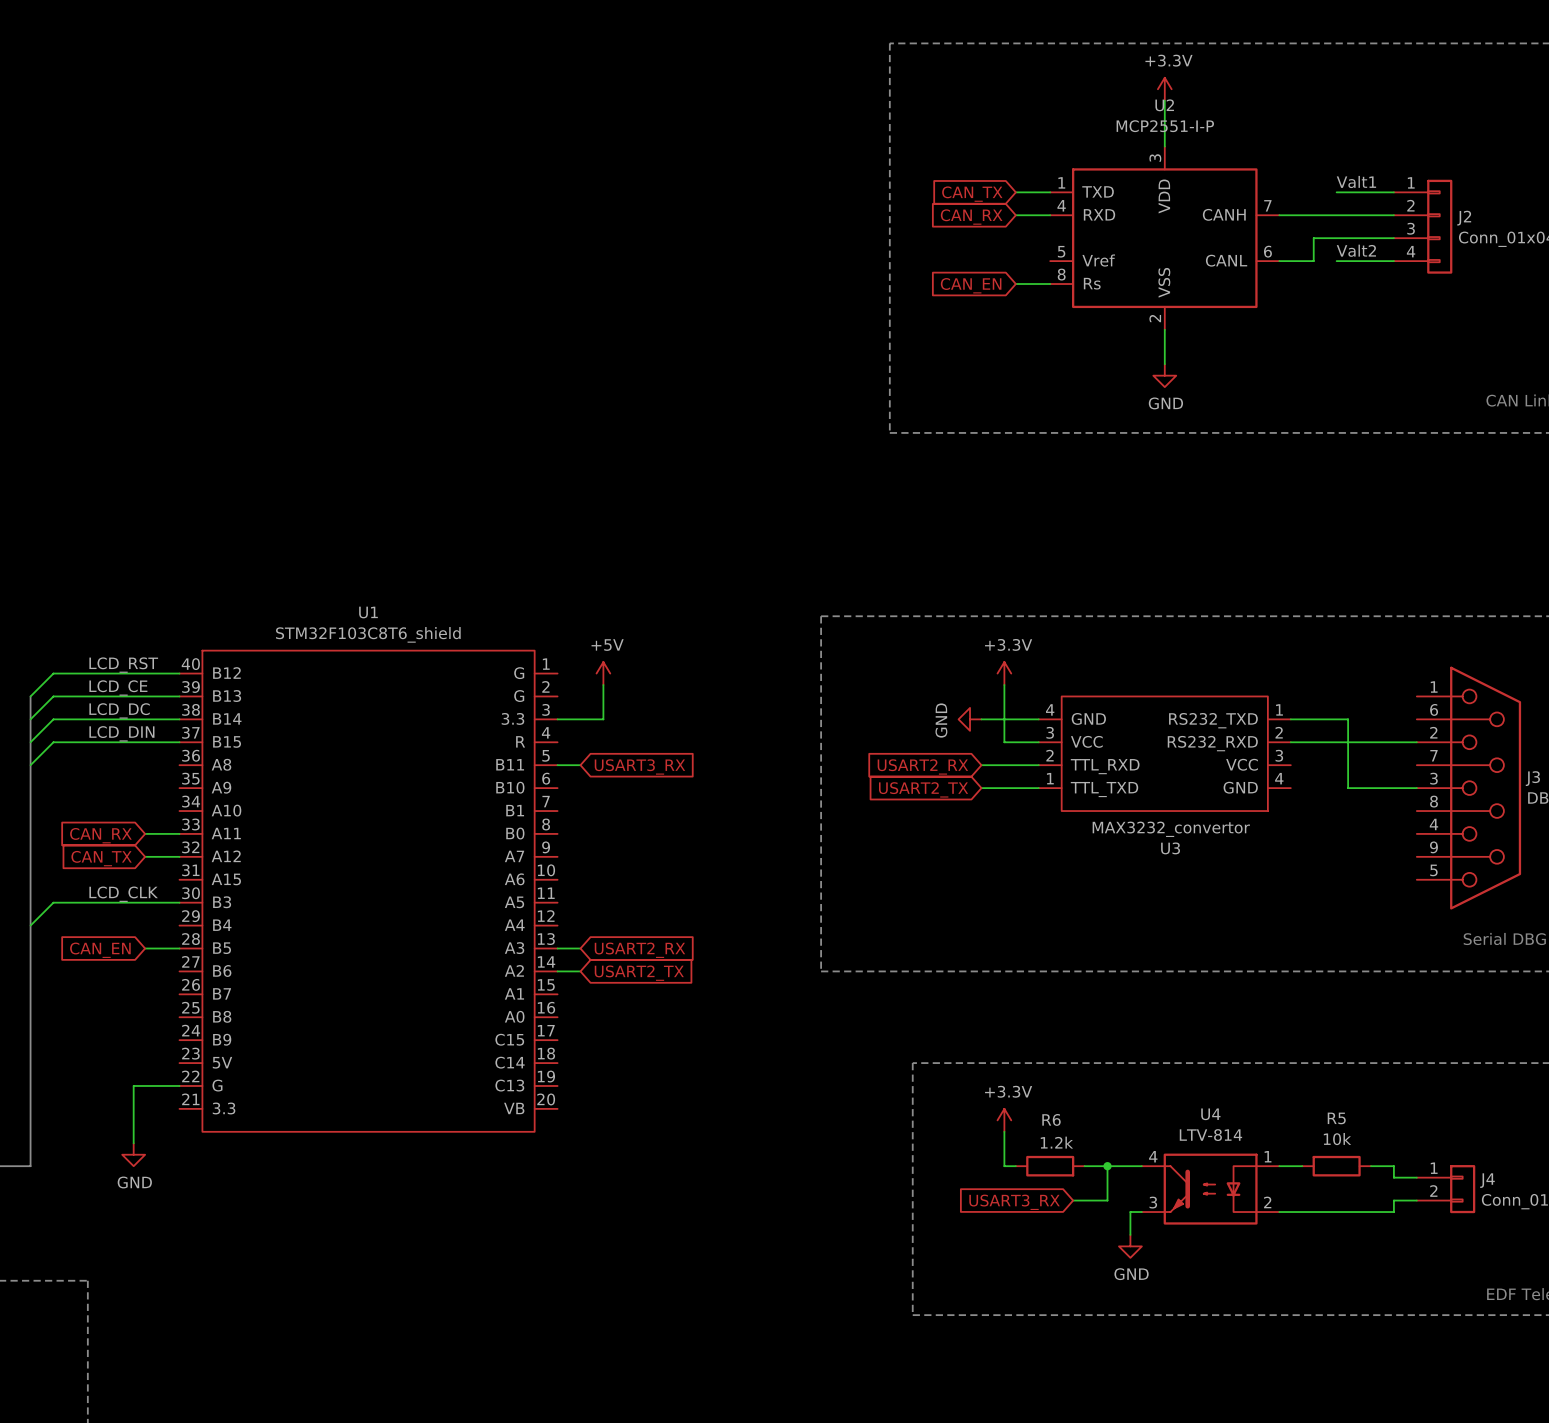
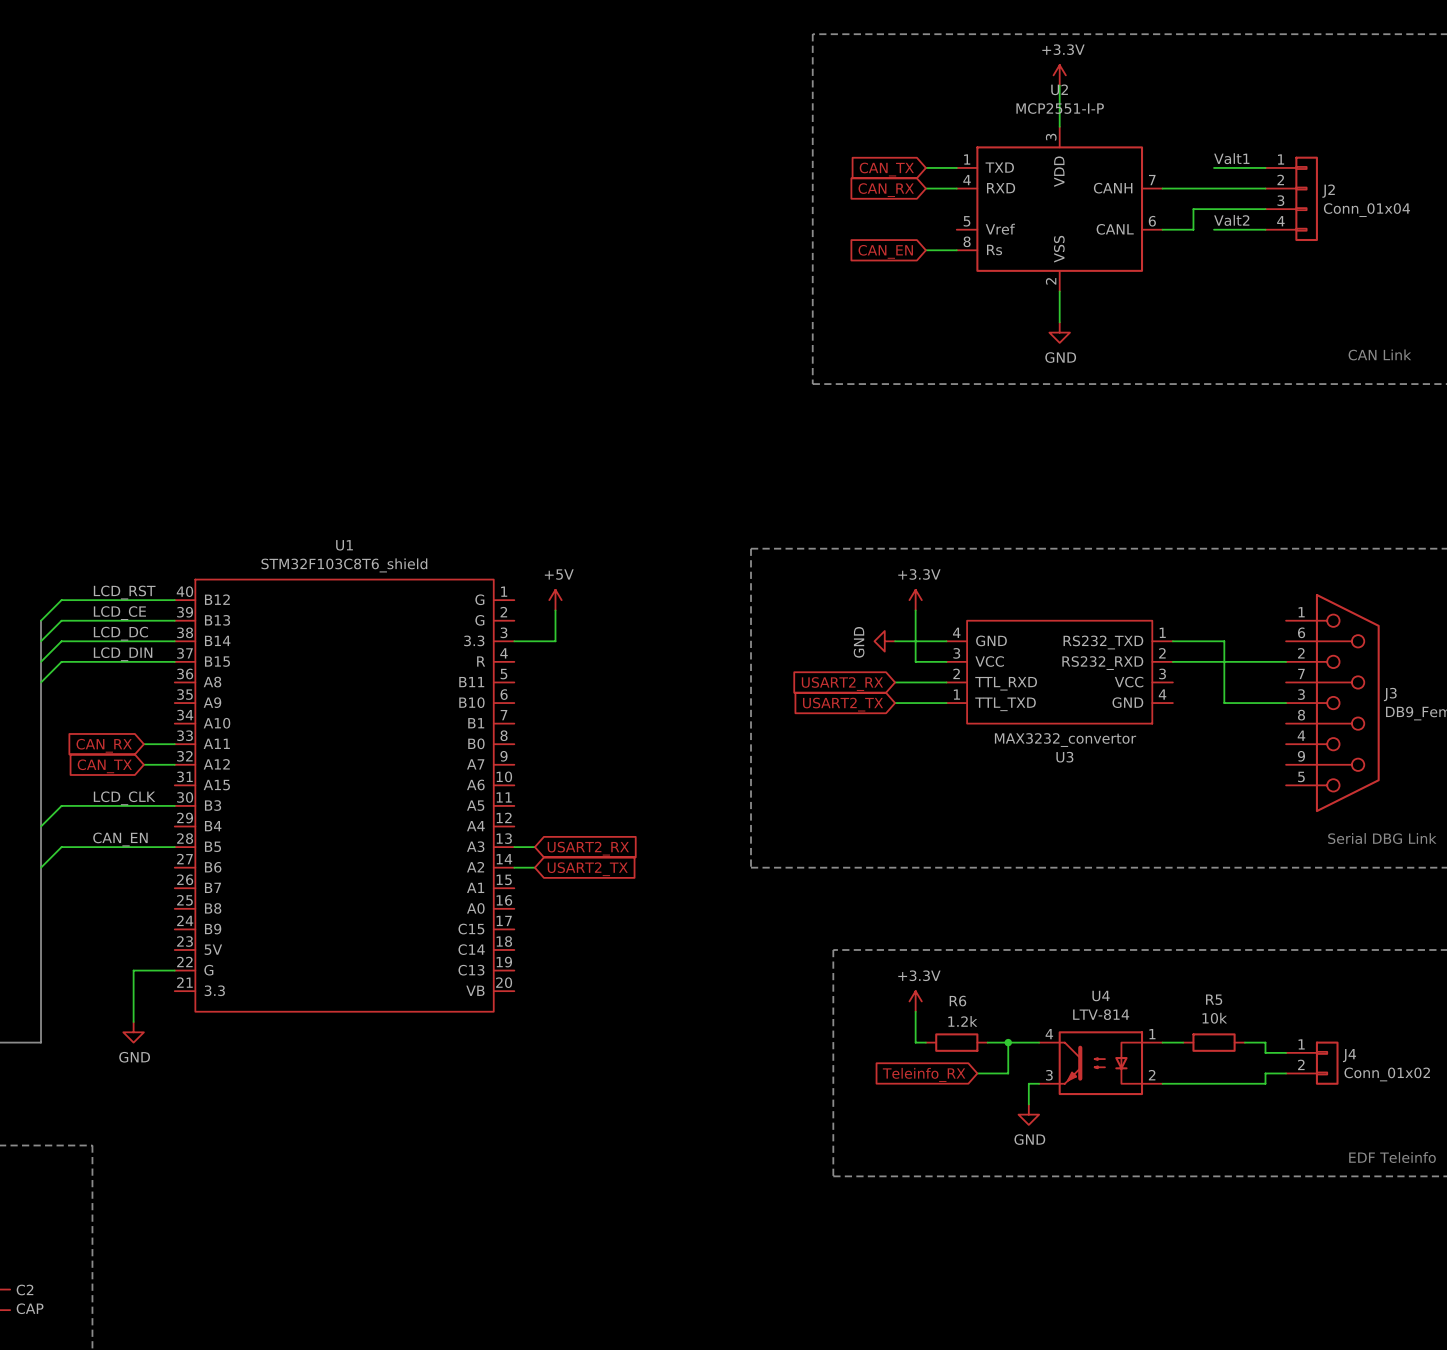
wire: (557, 765) (580, 765) -> none
global label: USART3_RX (639, 766) -> none
label: none -> CAN_EN (120, 839)
wire: none -> (143, 847) (61, 847) (41, 867)
global label: CAN_EN (100, 950) -> none
global label: USART3_RX (1014, 1202) -> Teleinfo_RX (924, 1074)

